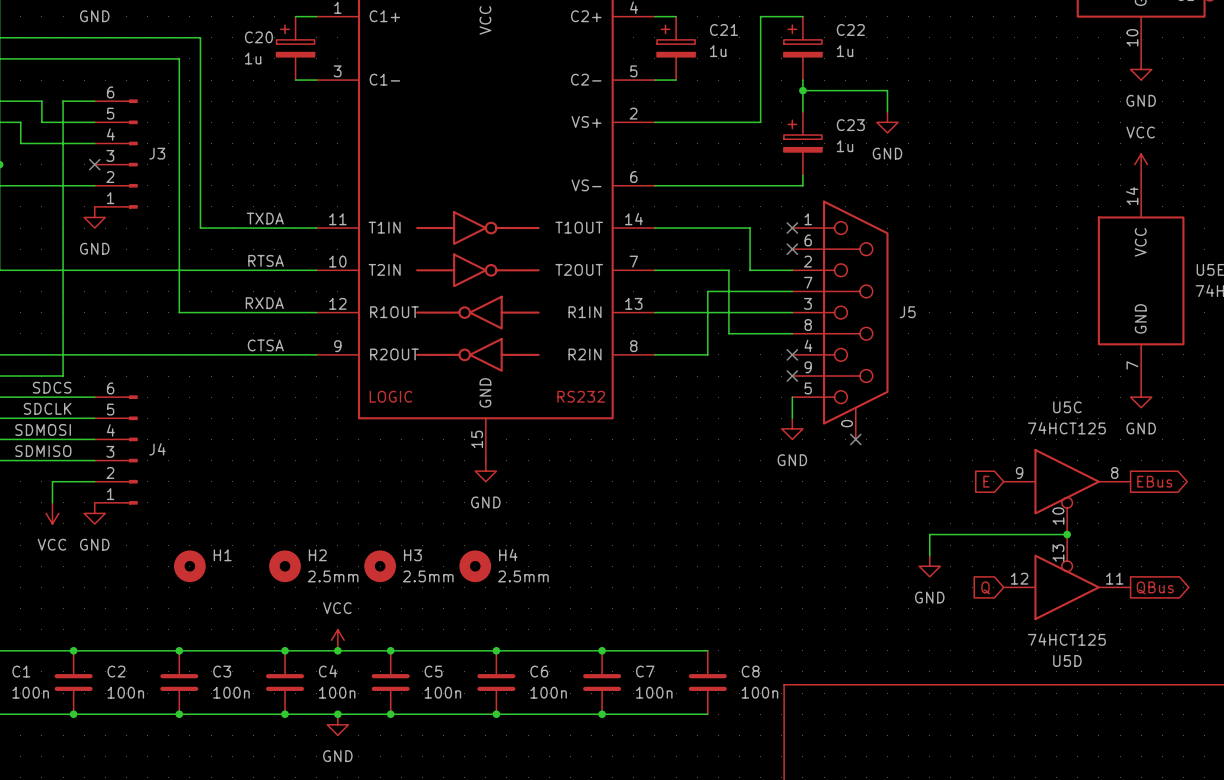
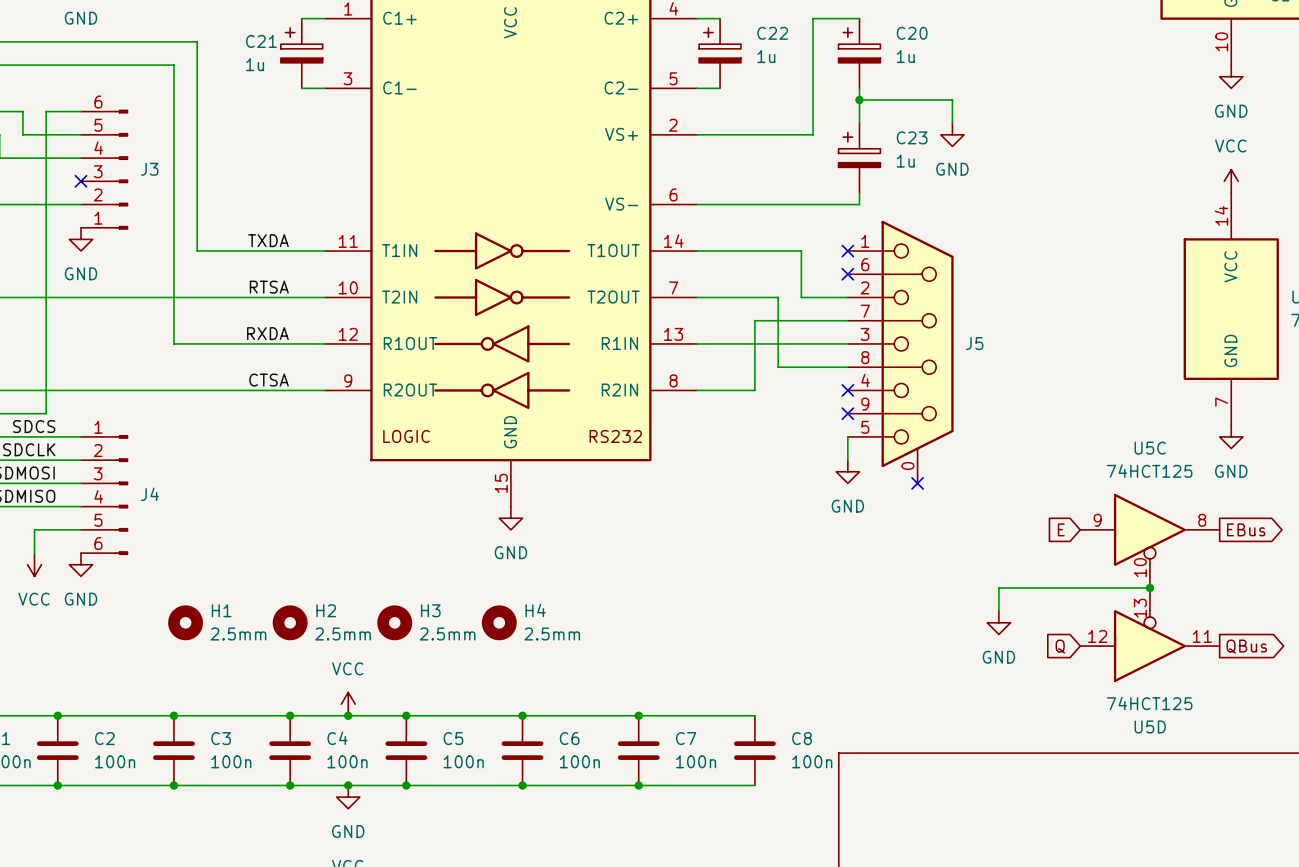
C21 name: C21 (723, 29) -> C22 (772, 33)
C22 name: C22 (850, 29) -> C20 (912, 33)
C20 name: C20 (258, 37) -> C21 (261, 41)
J4 flip: as is (131, 449) -> up-down (121, 495)
H1 value: none -> 2.5mm (238, 634)

